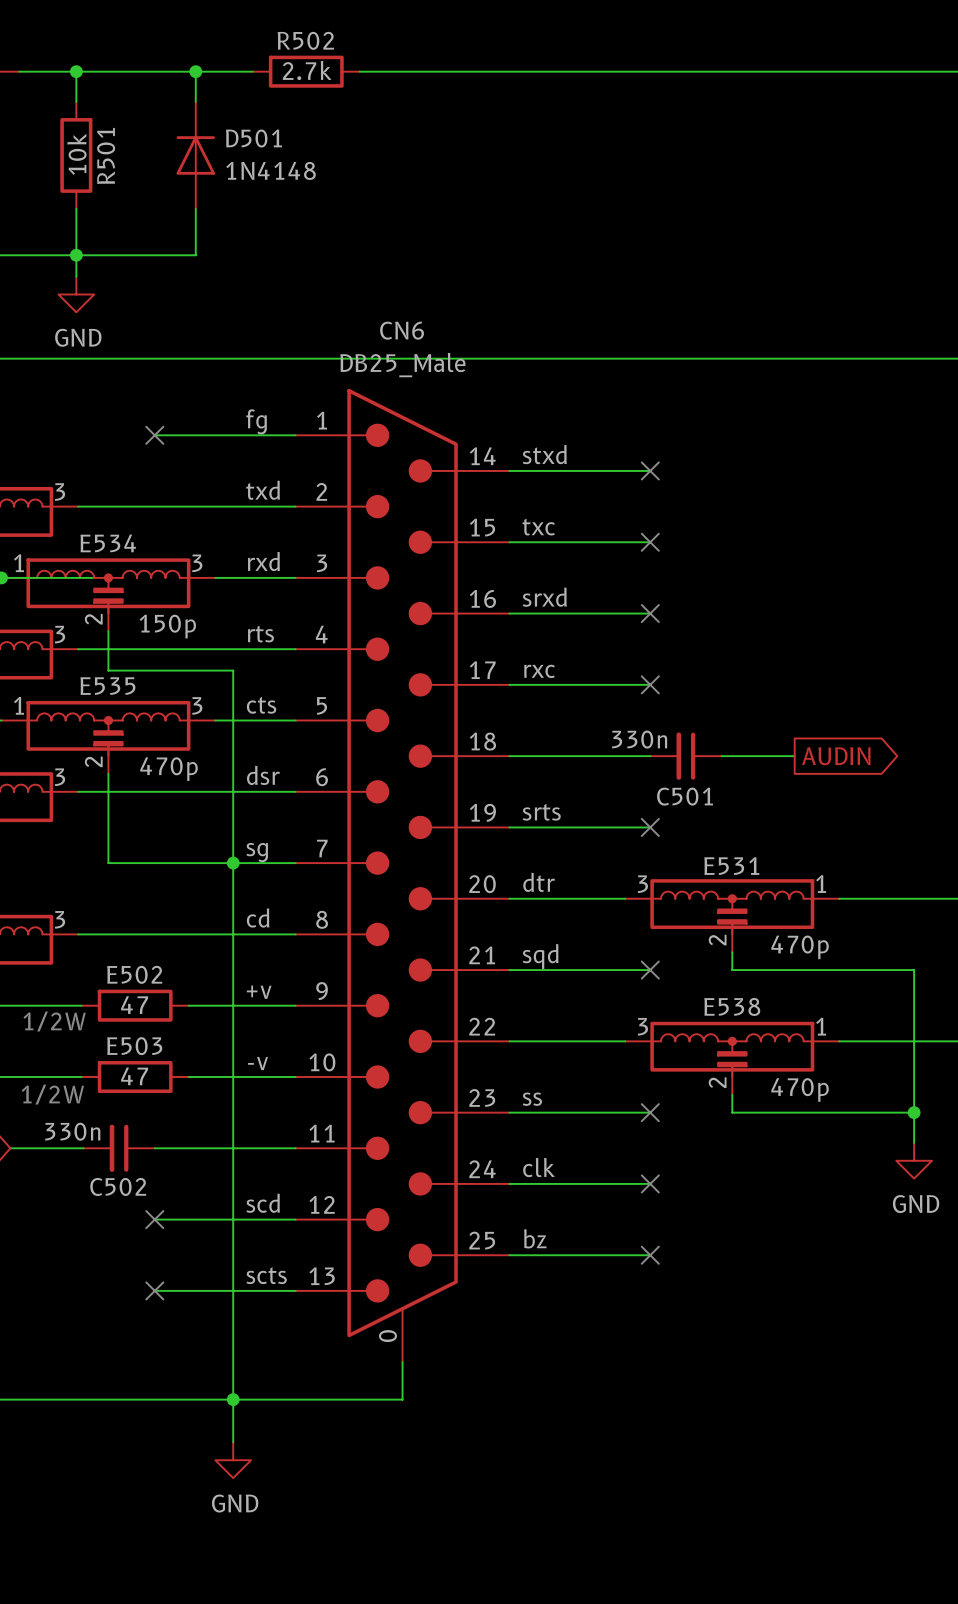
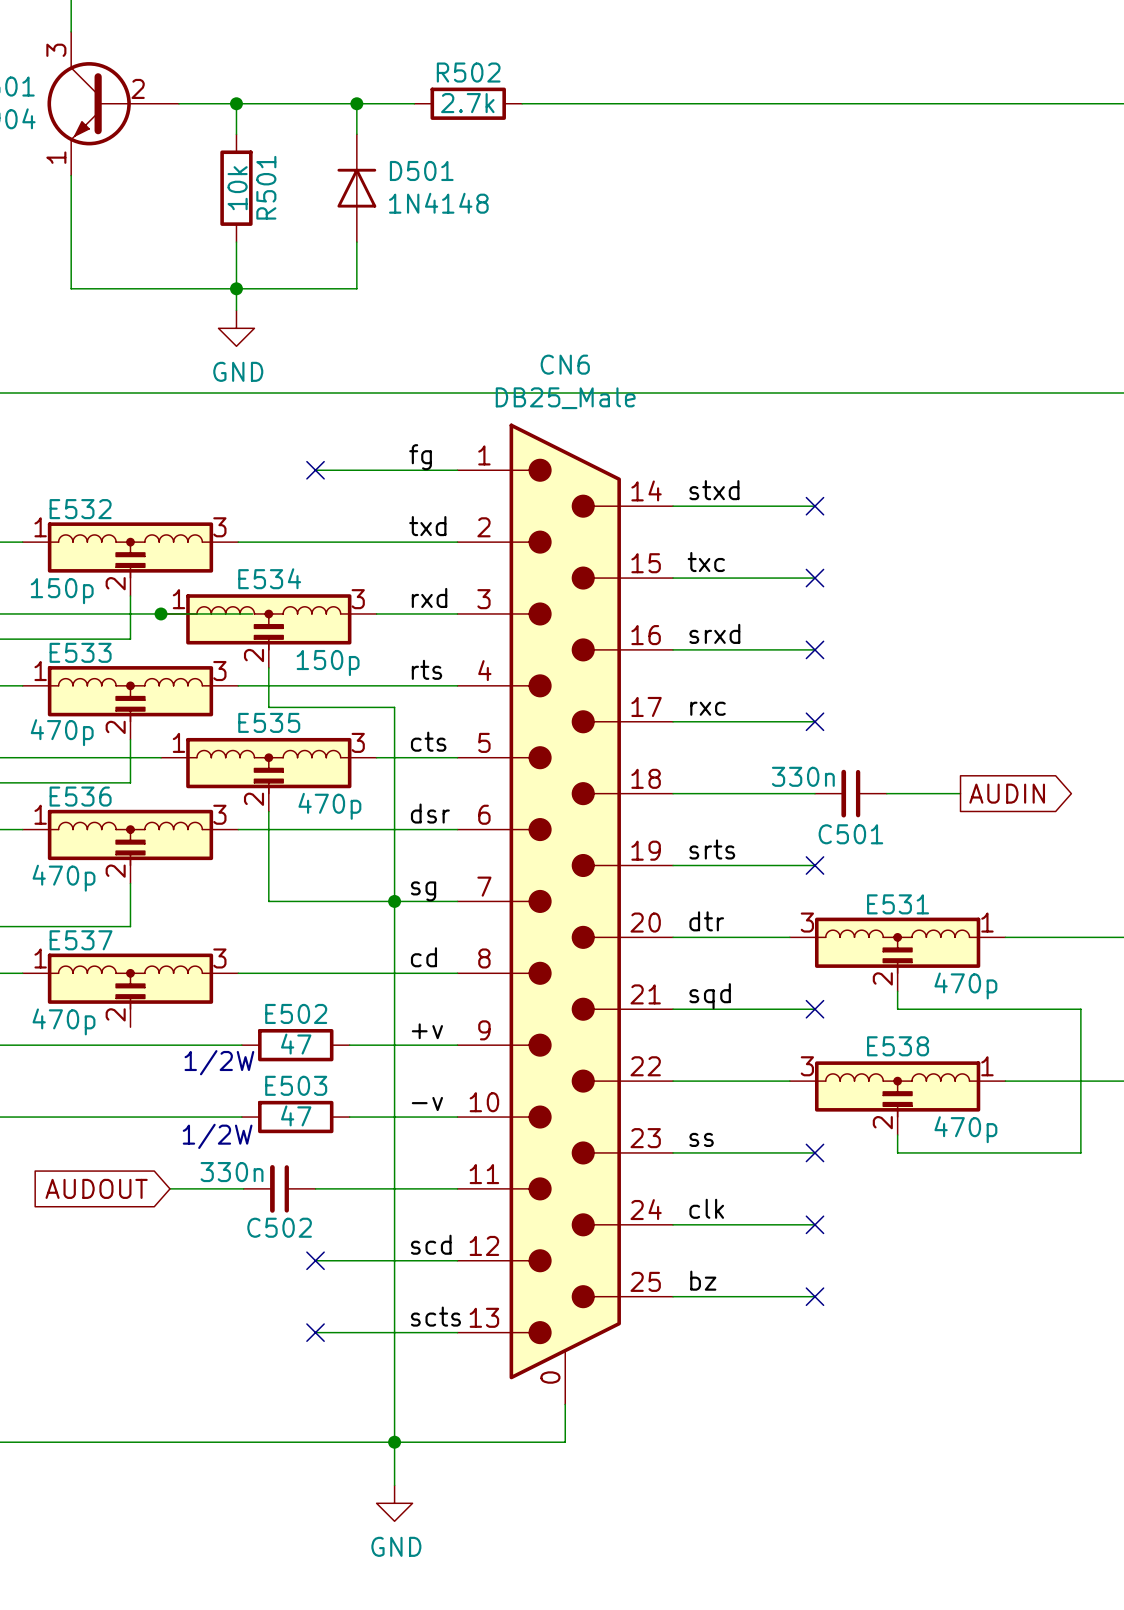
wire: (914, 1112) (914, 1142) -> none
junction: (914, 1112) -> none
power symbol: GND (914, 1160) -> none

